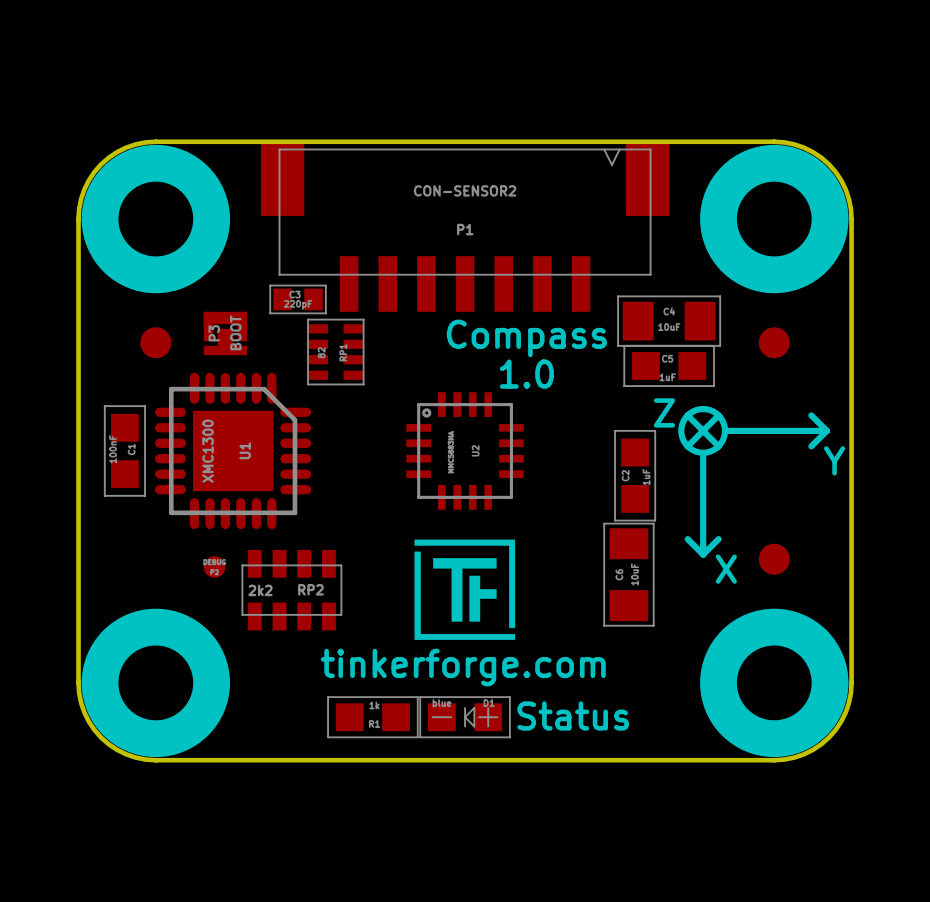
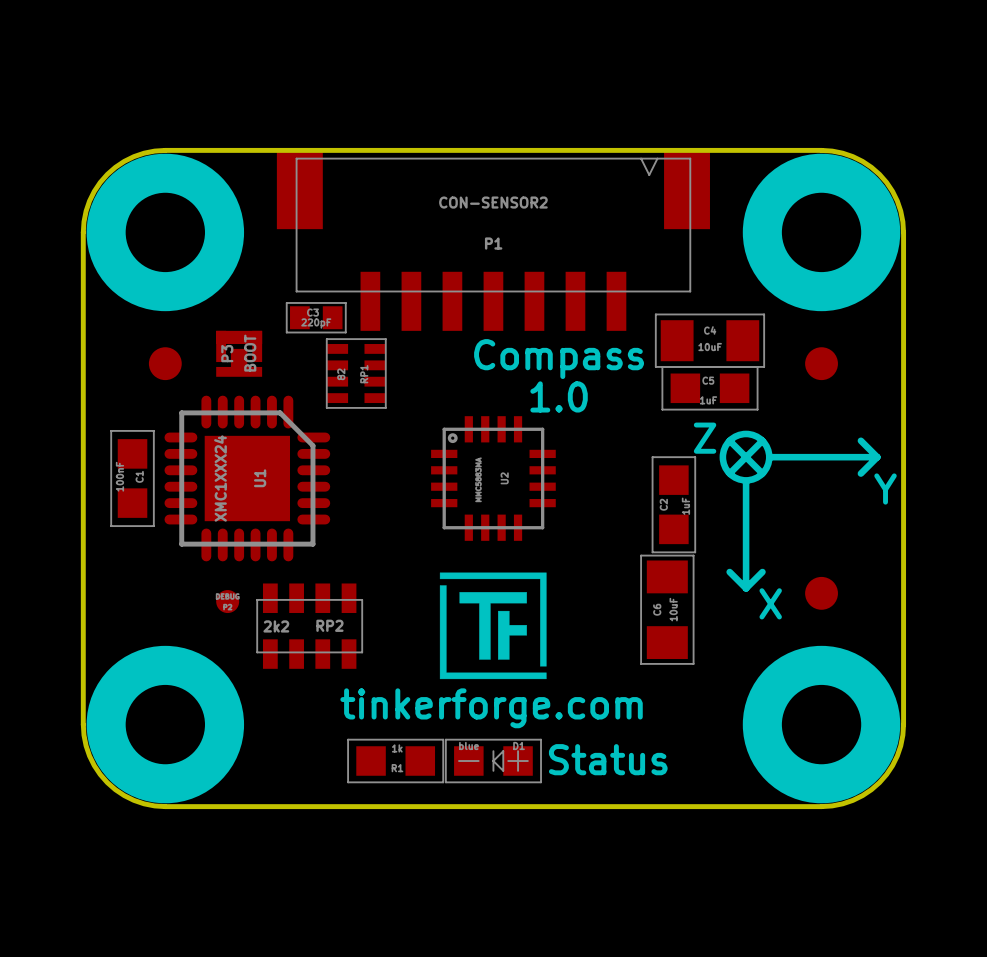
U1 value: XMC1300 (208, 451) -> XMC1XXX24 (220, 478)

